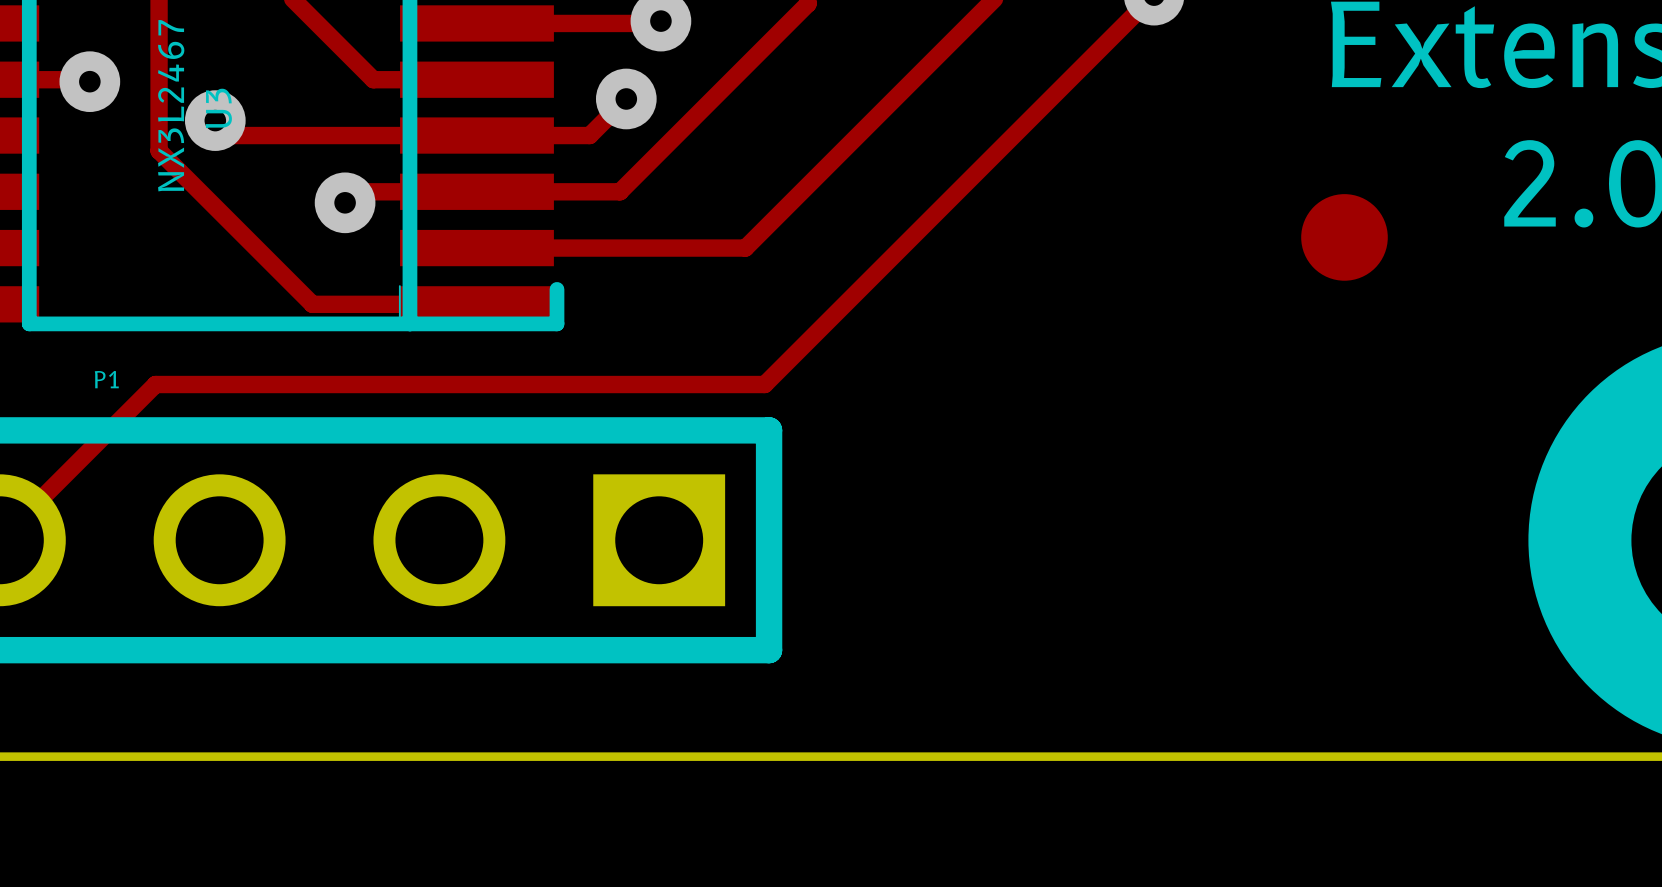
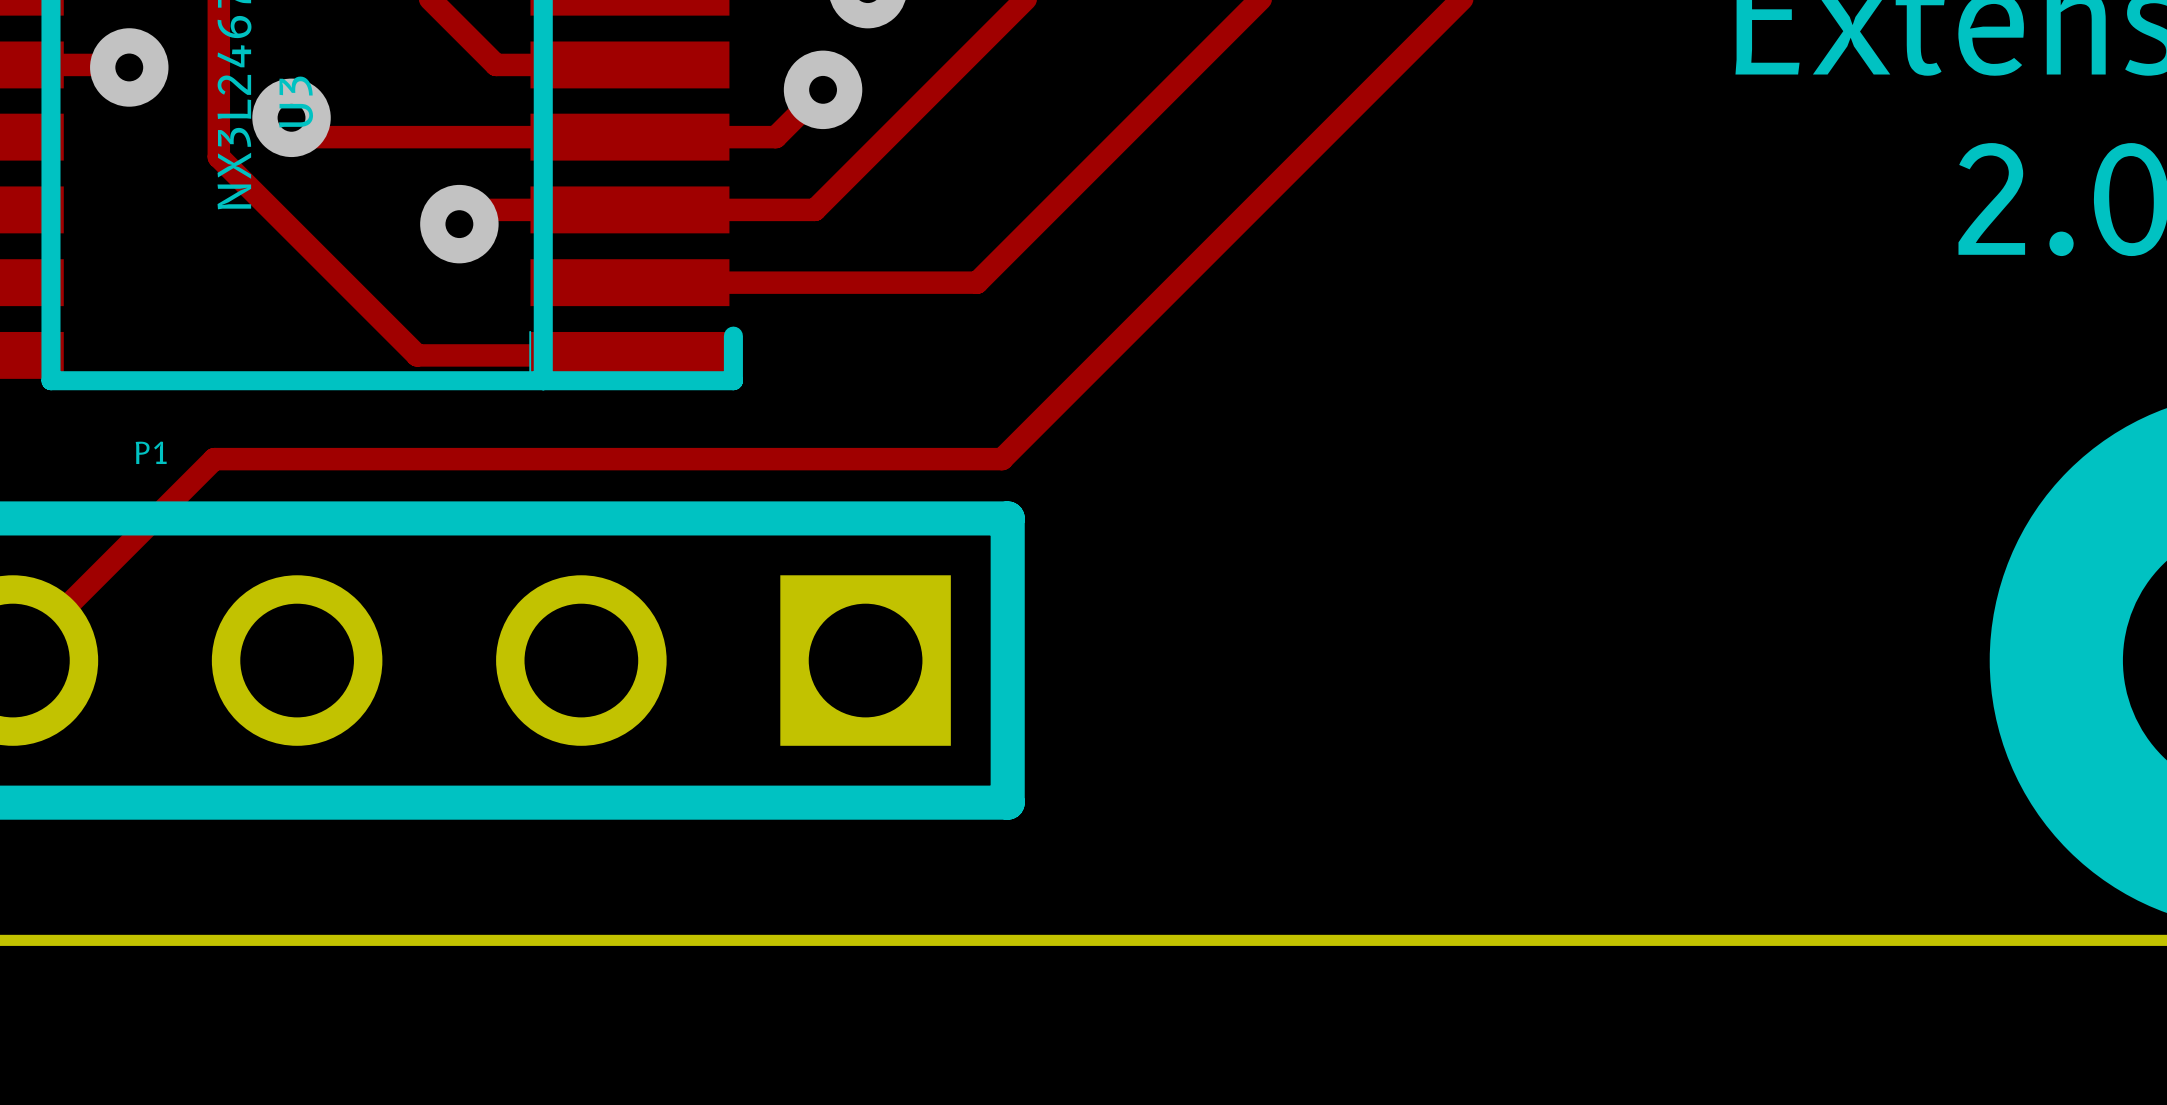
part: (1344, 237) -> none

